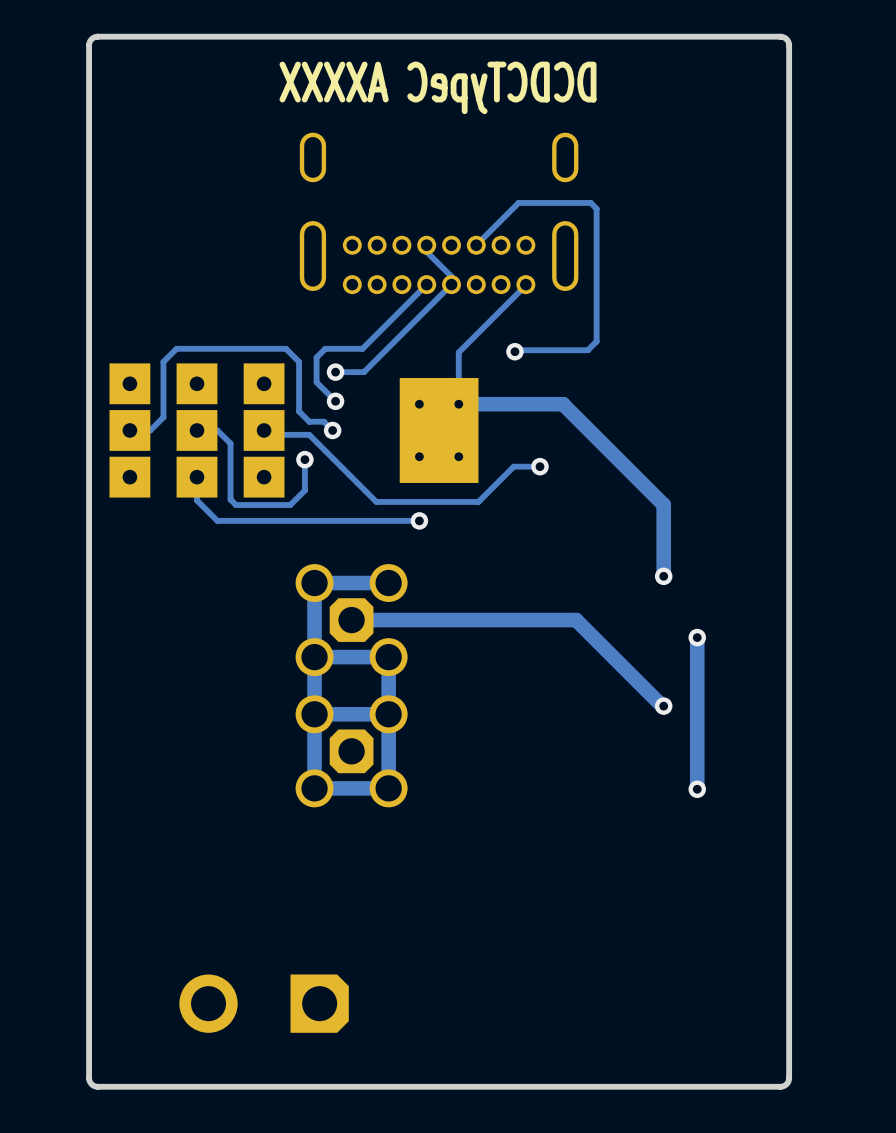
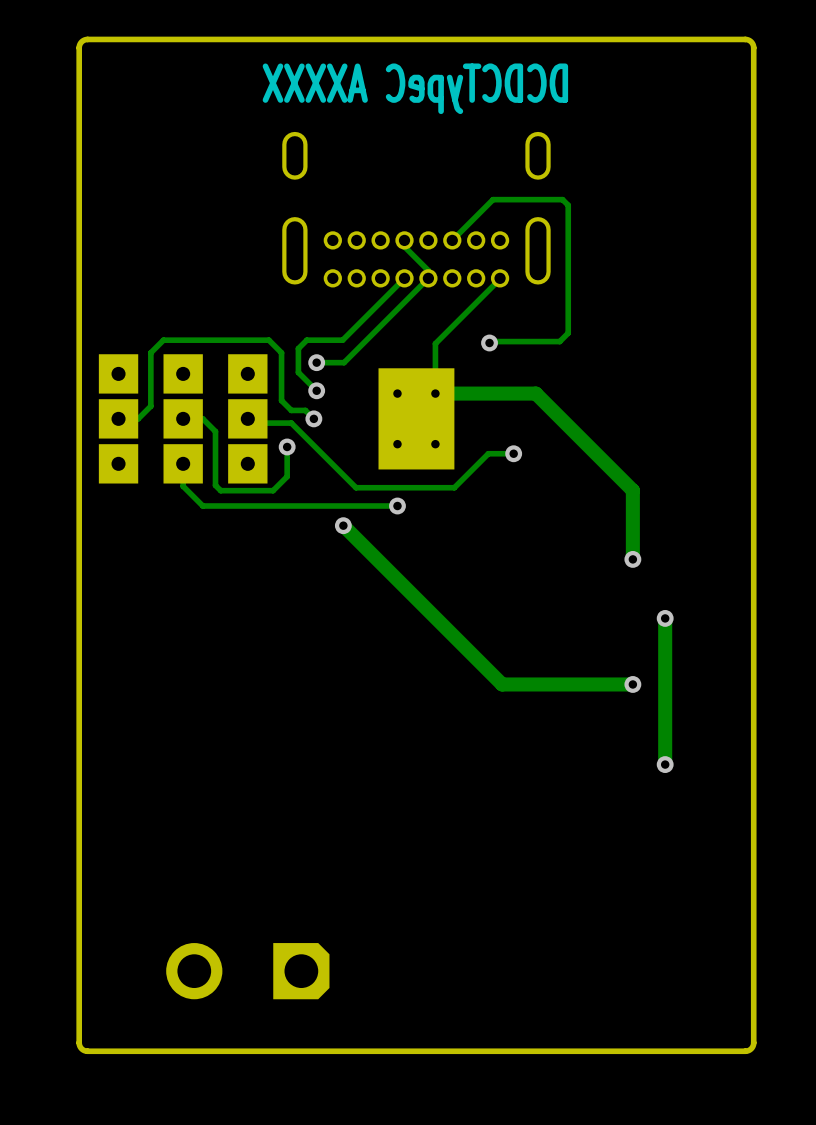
via: none -> (343, 525)
track: (388, 583) (314, 583) (314, 788) (388, 788) (388, 657) (314, 657) -> none
track: (351, 620) (576, 620) (662, 706) -> (343, 525) (502, 684) (631, 684)
part: (351, 620) -> none
track: (388, 714) (314, 714) -> none
part: (351, 751) -> none

